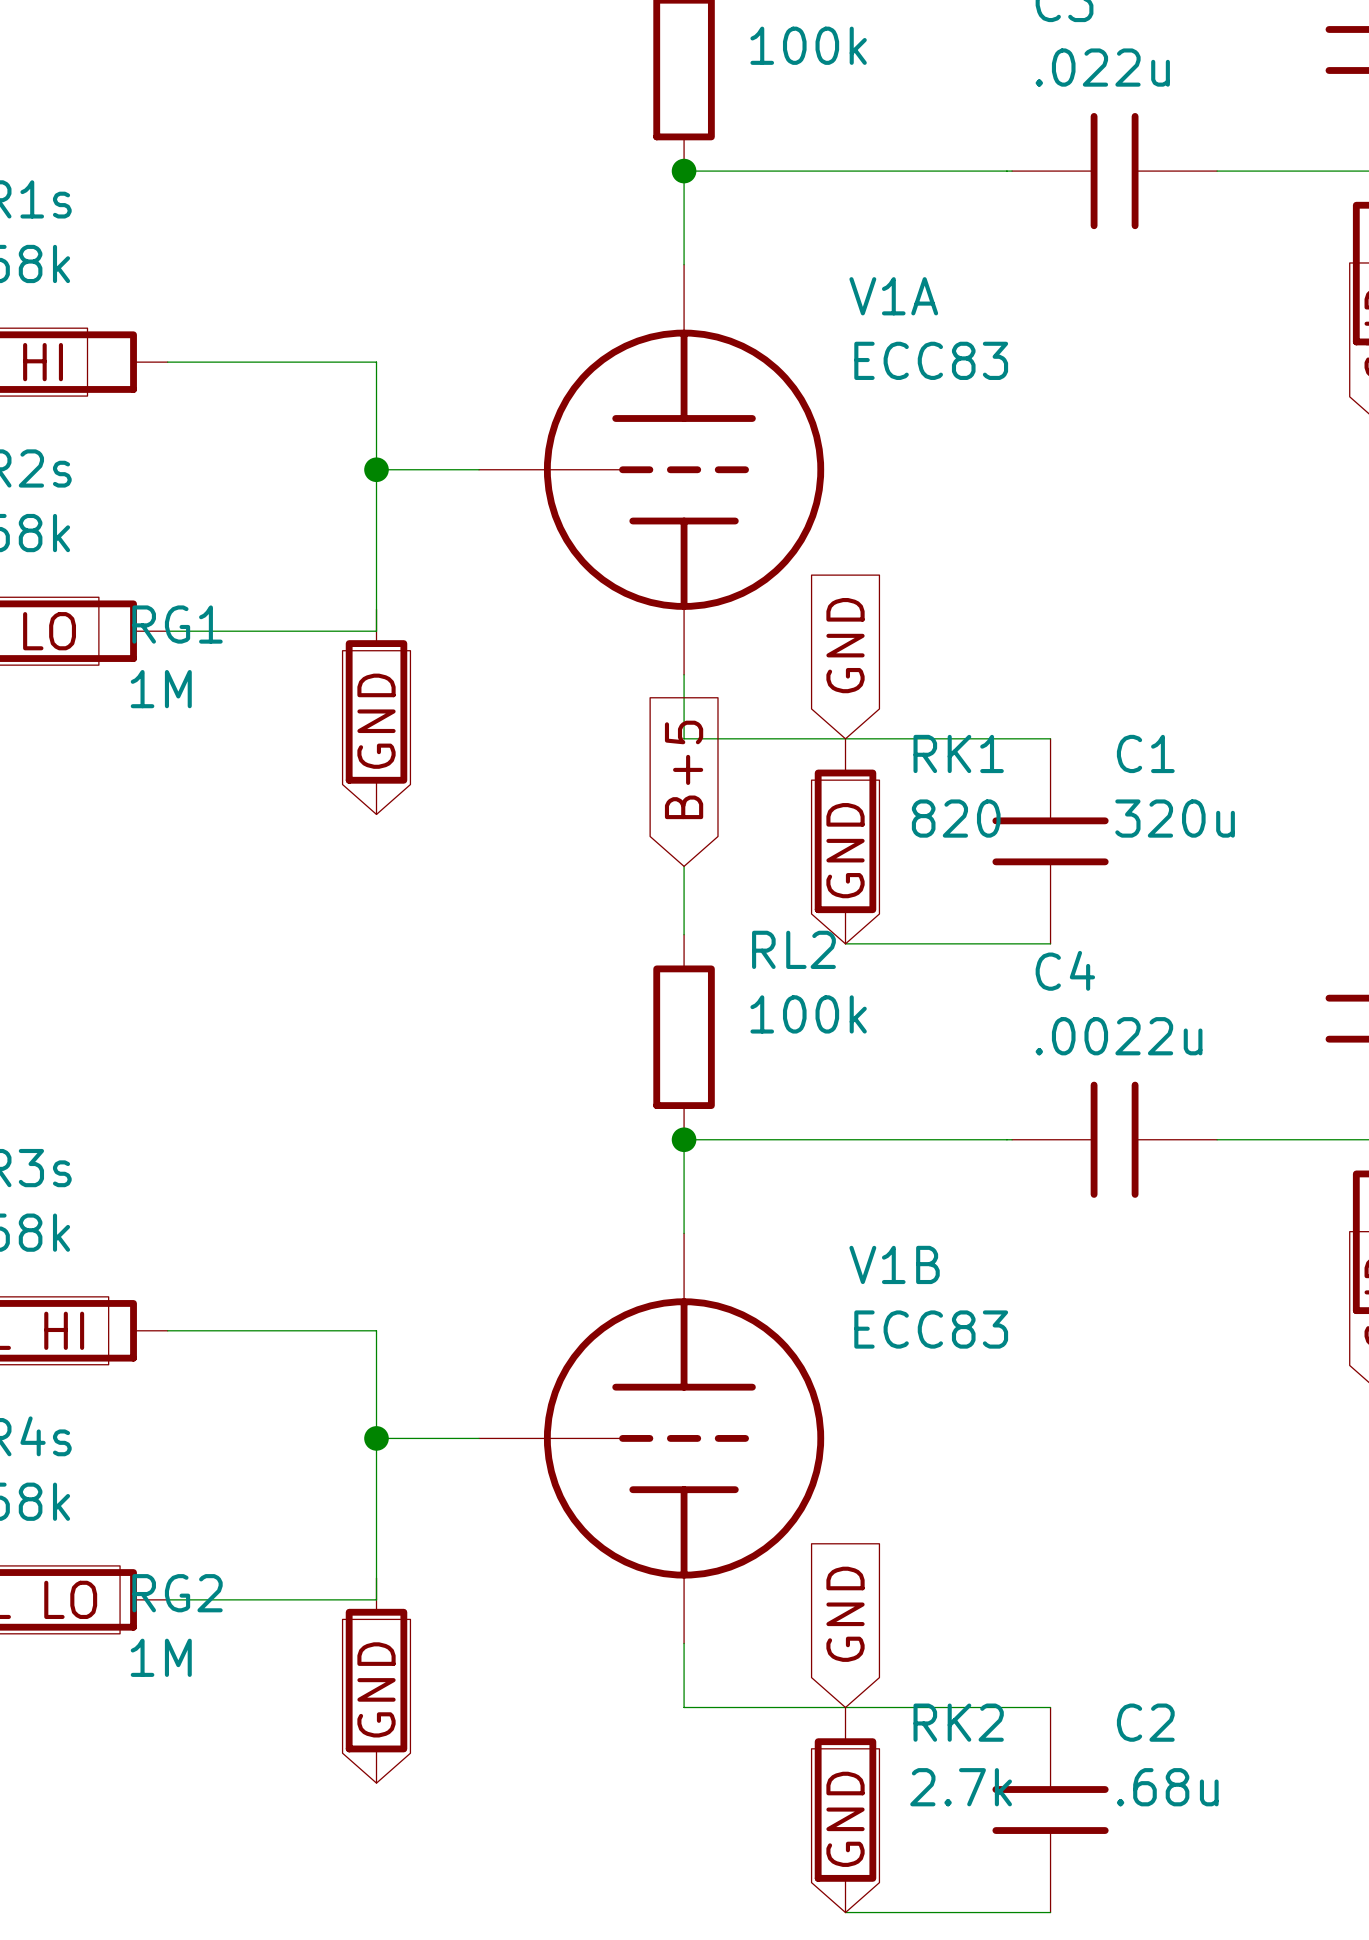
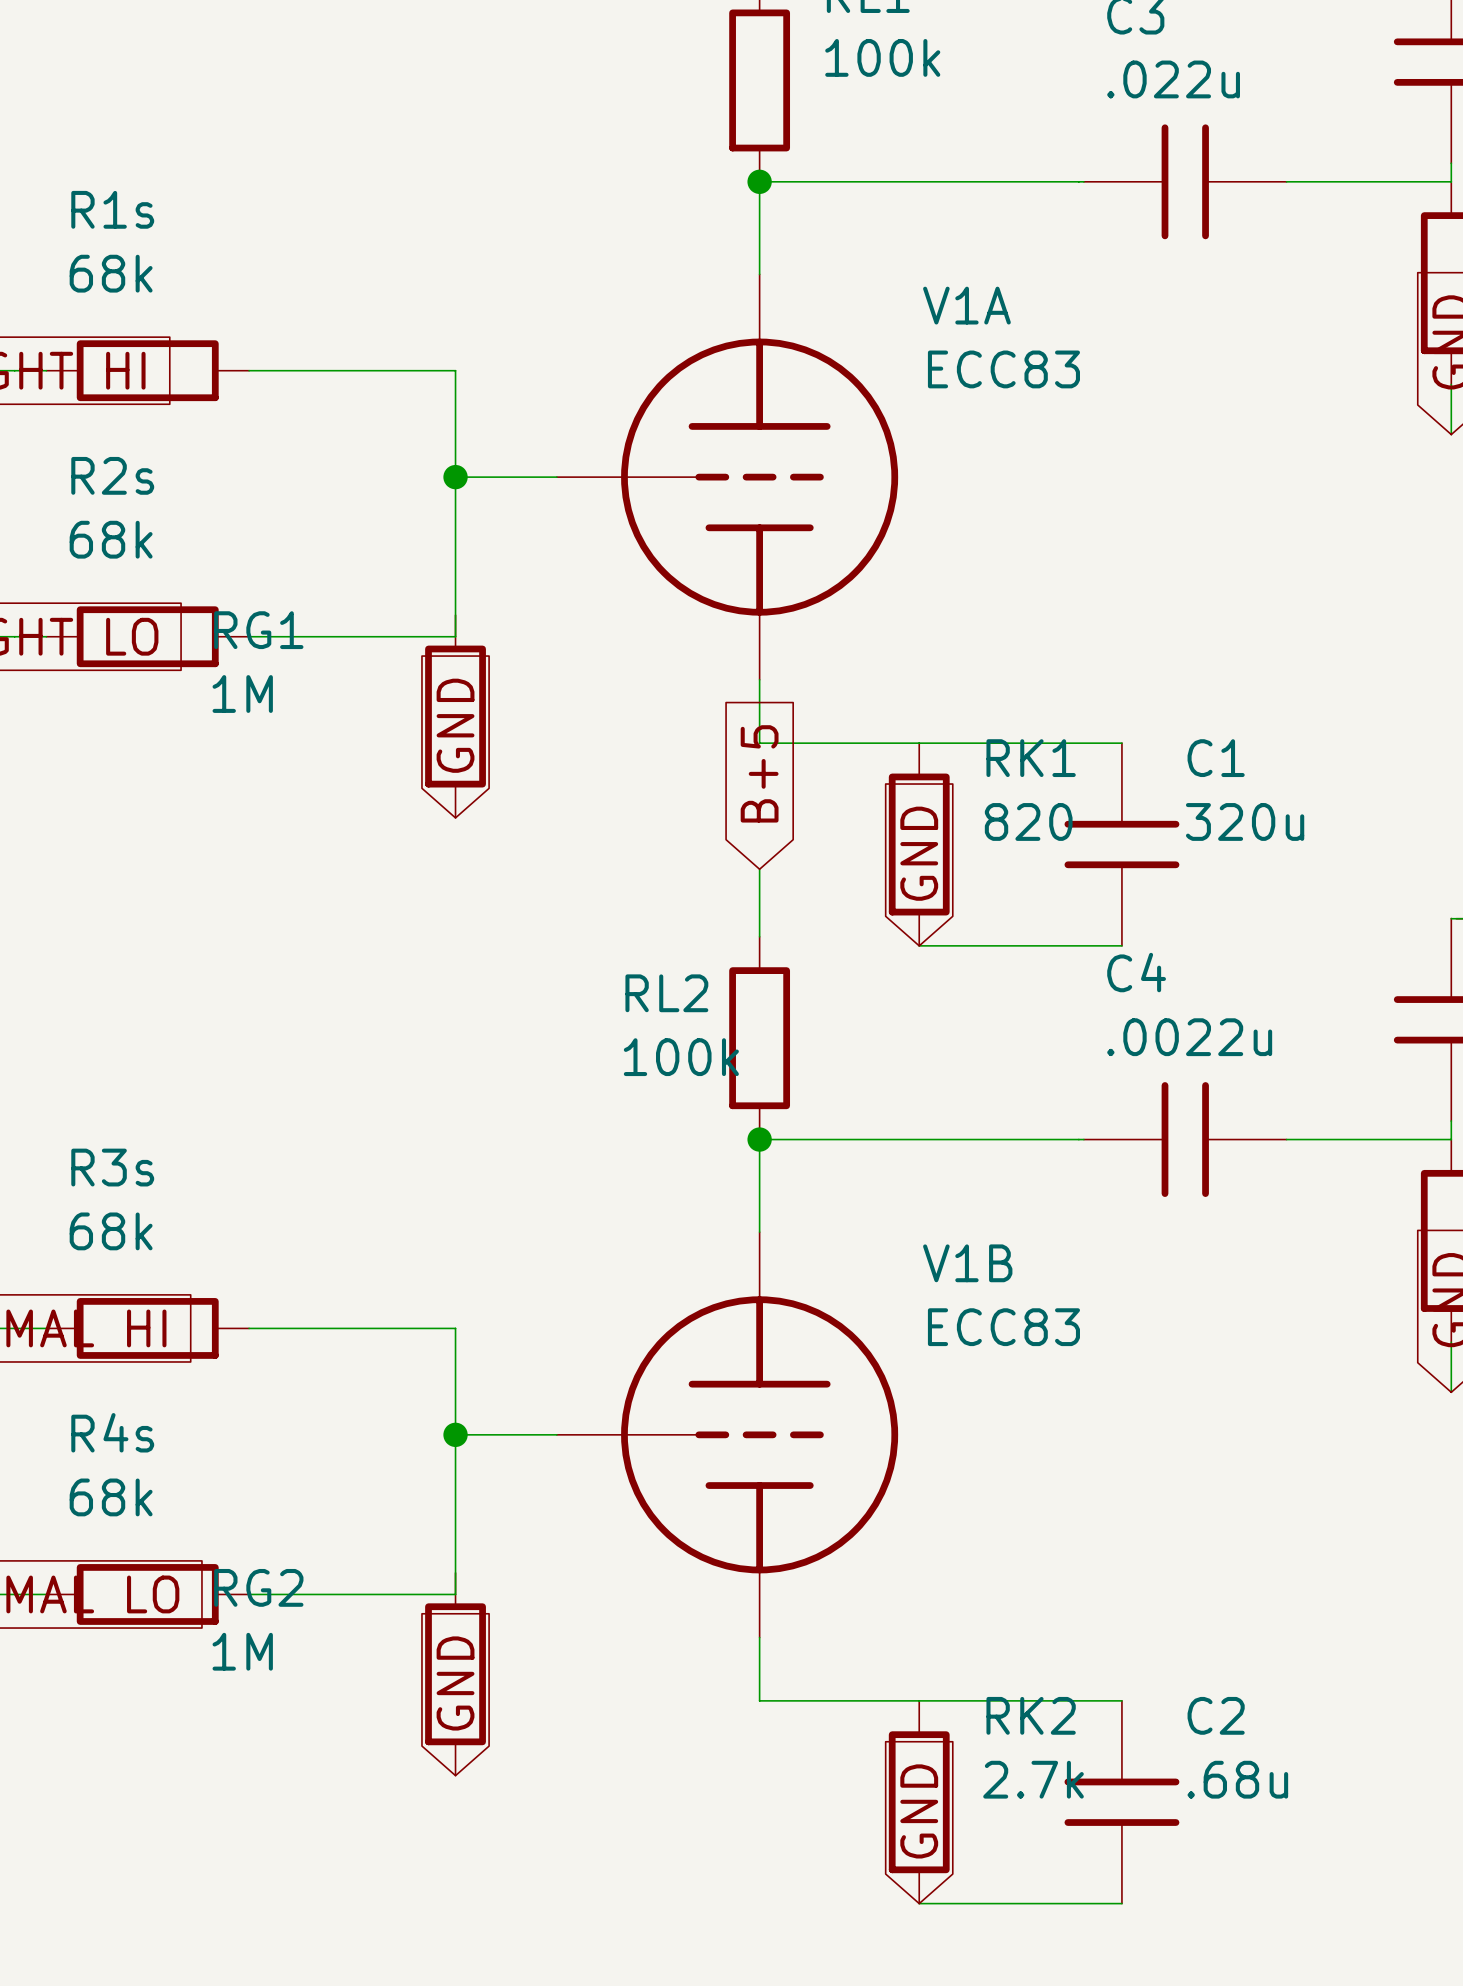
global label: GND (845, 645) -> none
RL2 name position: RL2 (793, 949) -> RL2 (666, 993)
RL2 value position: 100k (808, 1014) -> 100k (681, 1057)
global label: GND (845, 1614) -> none

